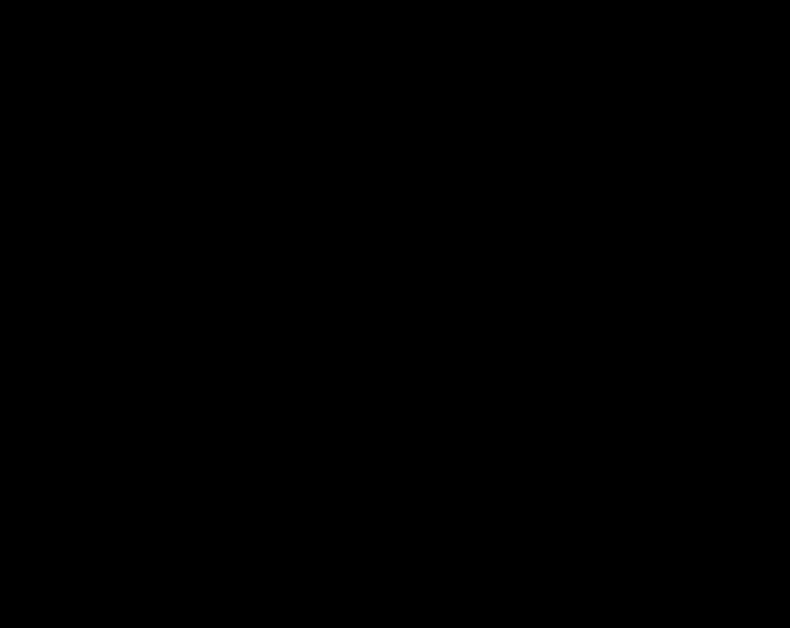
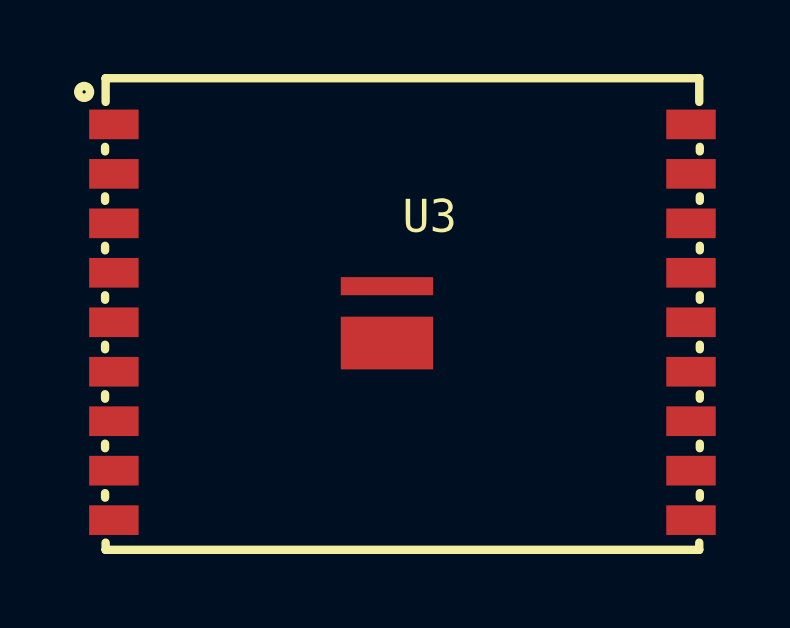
U3: none -> (394, 314)

